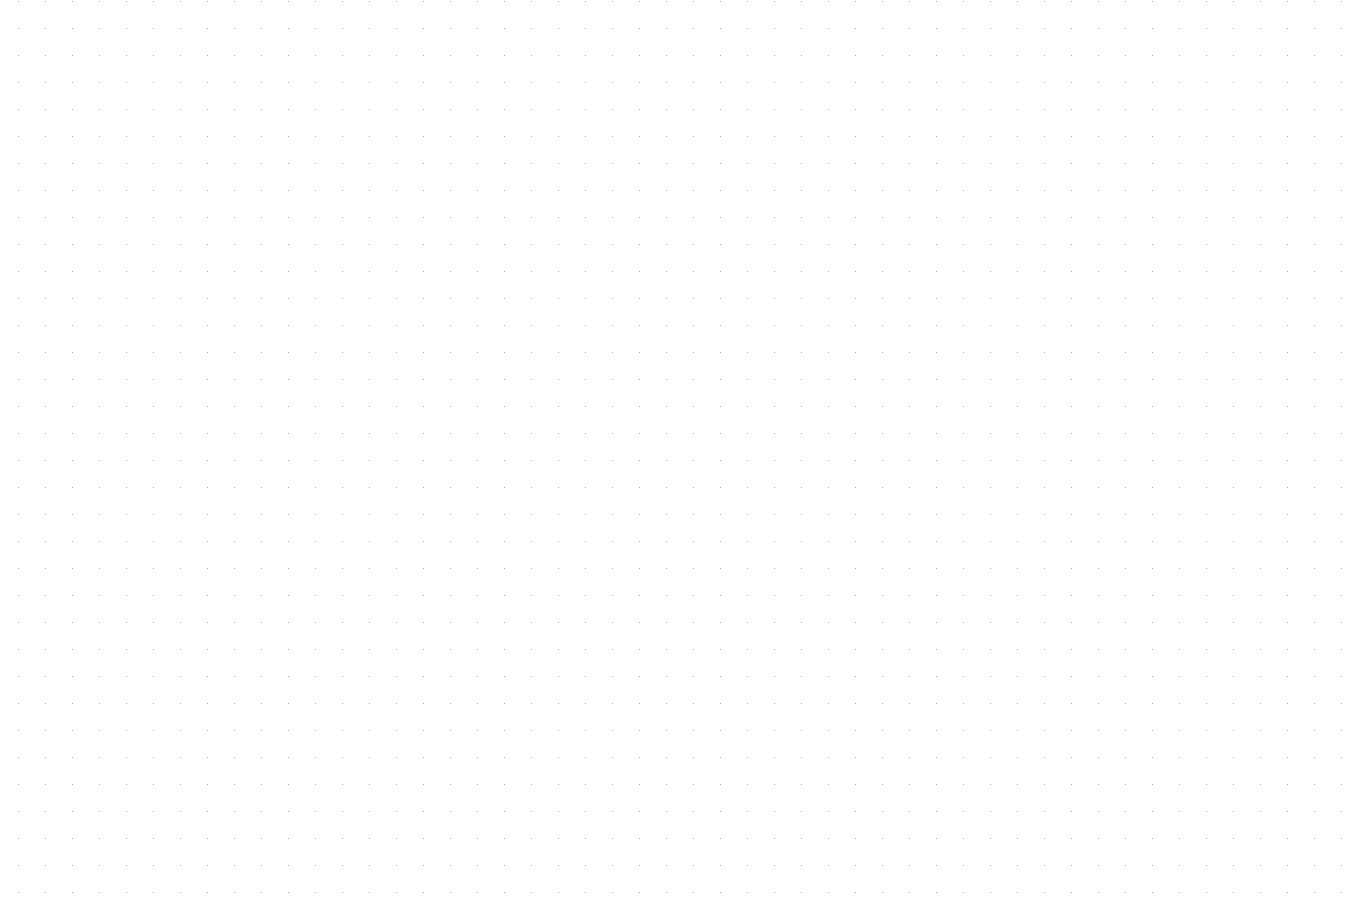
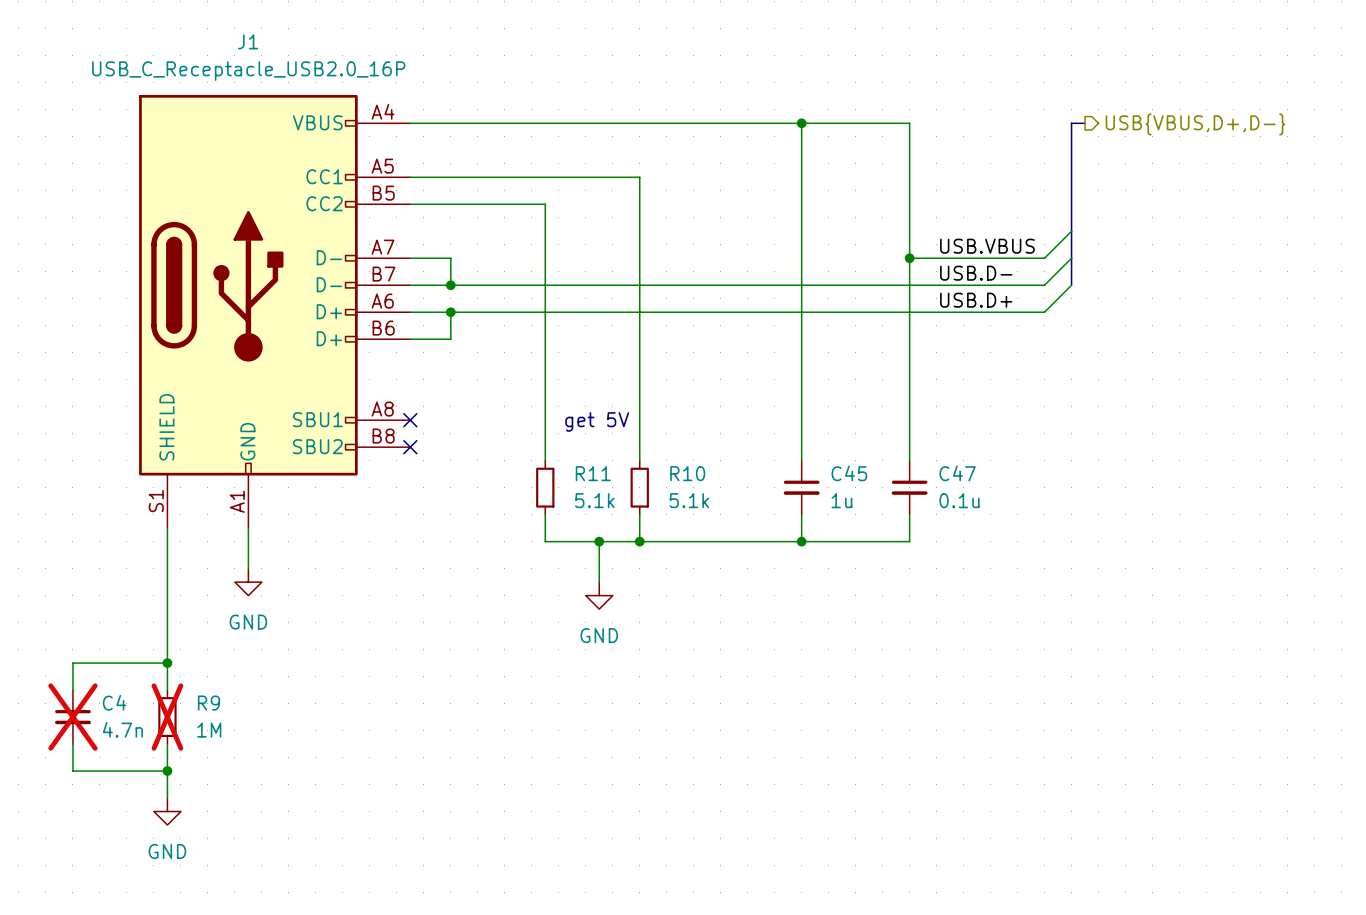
wire: none -> (410, 123) (909, 123) (909, 460)
wire: none -> (801, 123) (801, 460)
junction: none -> (801, 123)
bus: none -> (1085, 123) (1071, 123) (1071, 285)
hierarchical label: none -> USB{VBUS,D+,D-} (1195, 124)
wire: none -> (410, 177) (639, 177) (639, 460)
wire: none -> (410, 204) (545, 204) (545, 460)
wire: none -> (1071, 231) (1044, 258) (909, 258)
label: none -> USB.VBUS (987, 246)
wire: none -> (410, 258) (450, 258) (450, 285)
junction: none -> (909, 258)
wire: none -> (1071, 258) (1044, 285) (410, 285)
label: none -> USB.D- (976, 273)
junction: none -> (450, 285)
wire: none -> (1071, 285) (1044, 312) (410, 312)
label: none -> USB.D+ (976, 300)
J1: none -> USB_C_Receptacle_USB2.0_16P (274, 311)
wire: none -> (450, 312) (450, 339) (410, 339)
junction: none -> (450, 312)
no-connect mark: none -> (410, 420)
text: none -> get 5V (597, 421)
no-connect mark: none -> (410, 447)
R11: none -> 5.1k (545, 487)
R10: none -> 5.1k (639, 487)
C45: none -> 1u (801, 487)
C47: none -> 0.1u (909, 487)
wire: none -> (545, 514) (545, 541) (909, 541) (909, 514)
wire: none -> (639, 514) (639, 541)
wire: none -> (801, 514) (801, 541)
wire: none -> (167, 528) (167, 690)
wire: none -> (248, 528) (248, 568)
wire: none -> (599, 541) (599, 582)
junction: none -> (599, 541)
junction: none -> (639, 541)
junction: none -> (801, 541)
power symbol: none -> GND (248, 582)
power symbol: none -> GND (599, 595)
wire: none -> (167, 663) (72, 663) (72, 690)
junction: none -> (167, 663)
C4: none -> 4.7n (72, 717)
R9: none -> 1M (167, 717)
wire: none -> (72, 744) (72, 771) (167, 771)
wire: none -> (167, 744) (167, 798)
junction: none -> (167, 771)
power symbol: none -> GND (167, 811)

